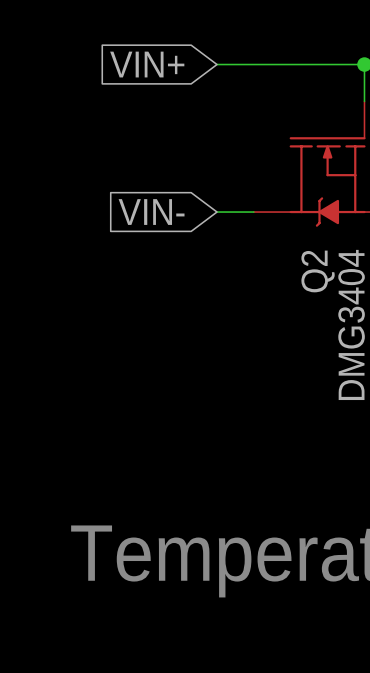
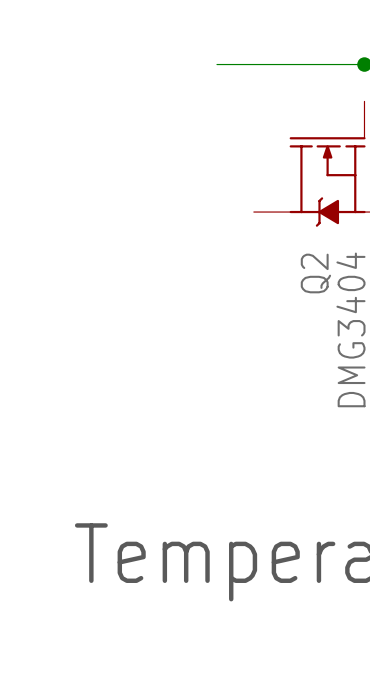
global label: VIN+ (147, 64) -> none
wire: (364, 64) (364, 101) -> none
global label: VIN- (151, 212) -> none
wire: (216, 212) (253, 212) -> none

